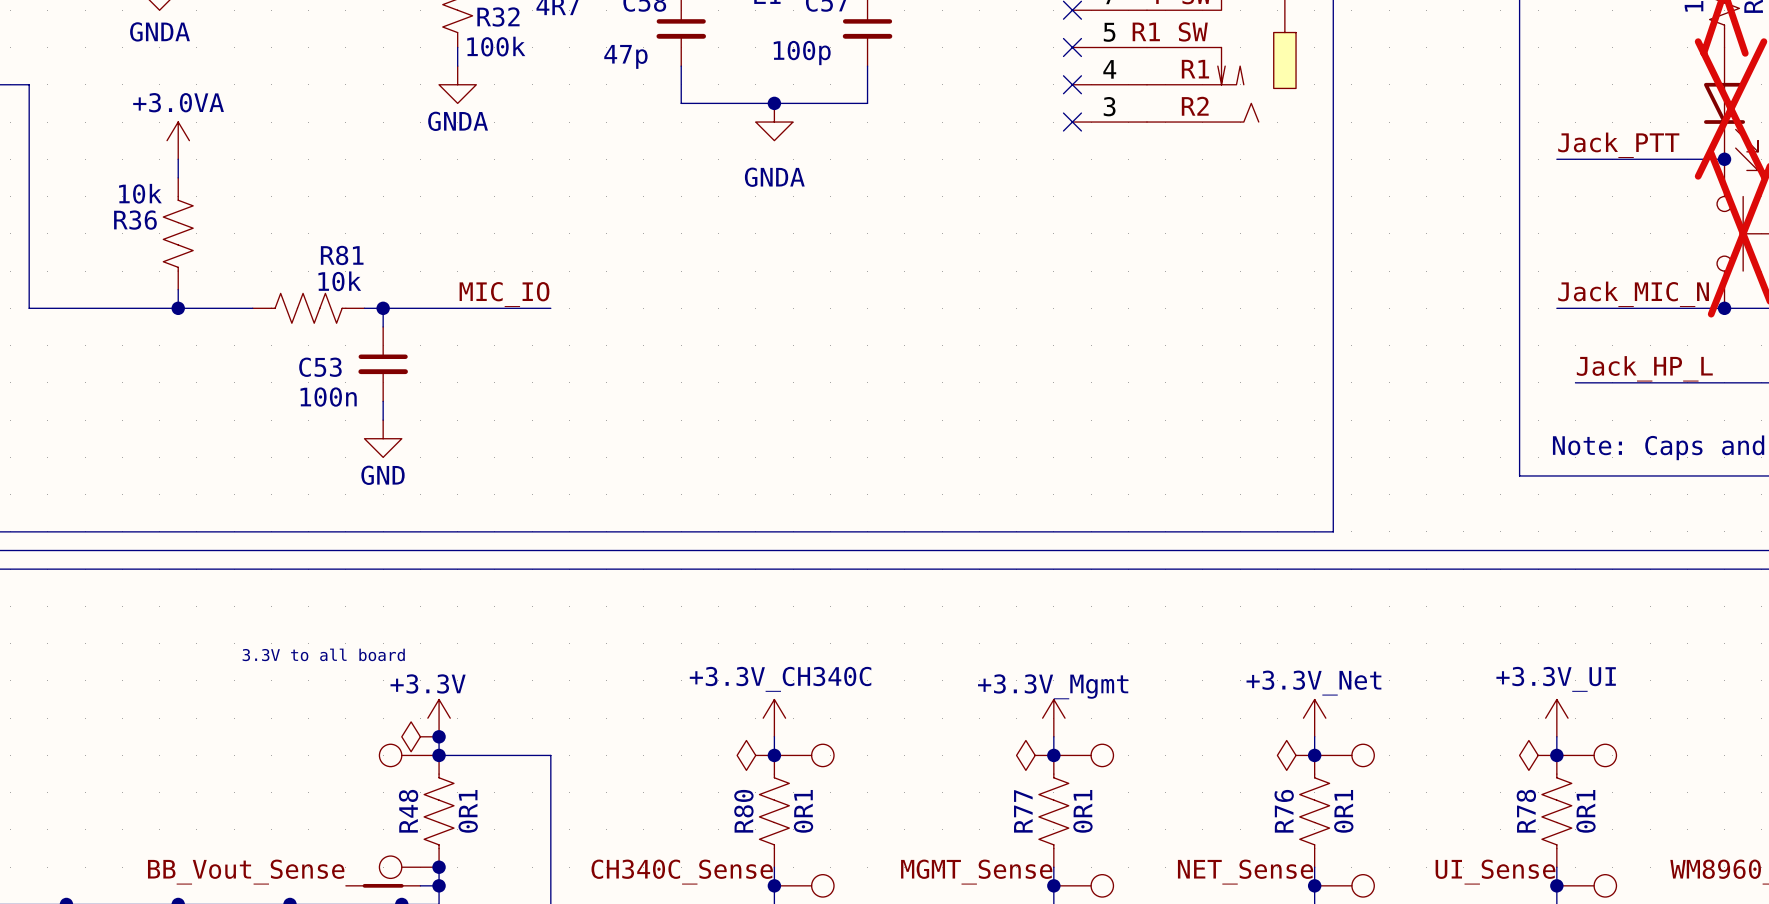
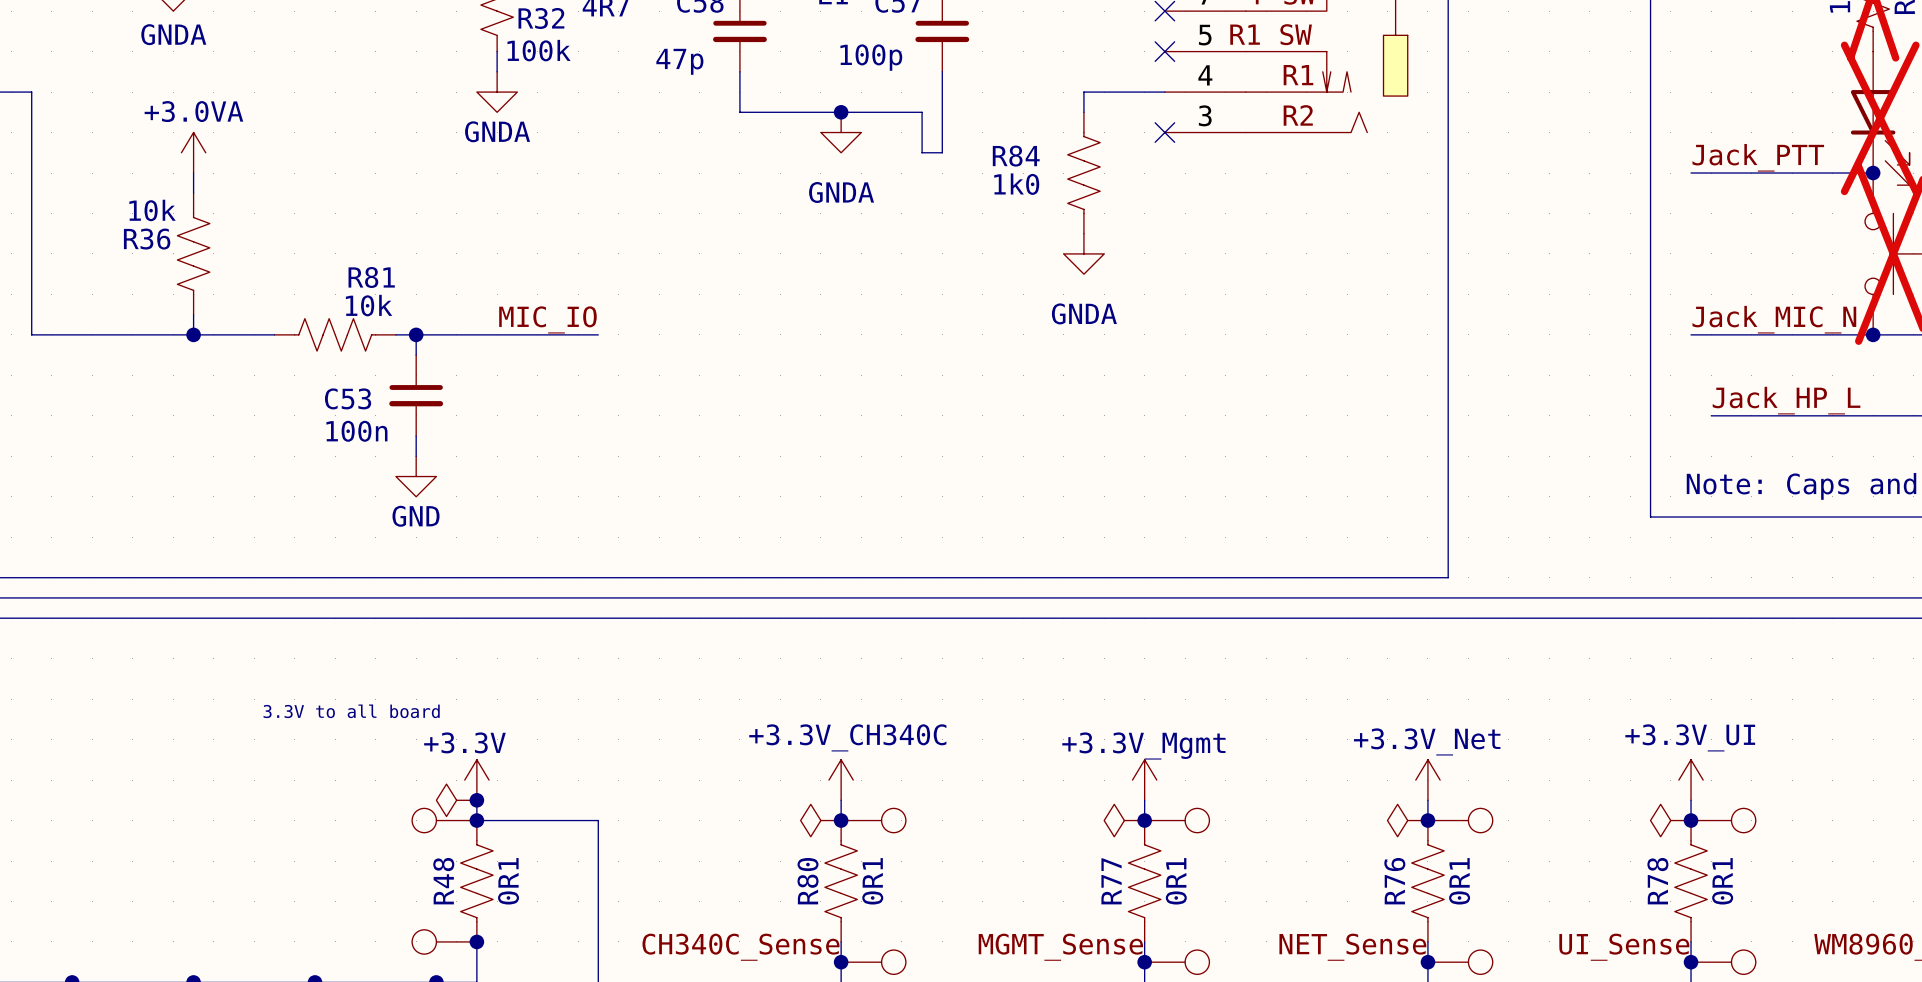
wire: none -> (1164, 92) (1083, 92) (1083, 112)
no-connect mark: (1072, 84) -> none
wire: (848, 103) (867, 103) -> (922, 112) (922, 152) (942, 152) (942, 112)
R84: none -> 1k0 (1083, 173)
power symbol: none -> GNDA (1083, 253)
label: BB_Vout_Sense (246, 872) -> none
part: (383, 885) -> none
wire: (420, 885) (439, 885) -> none
junction: (439, 885) -> none

